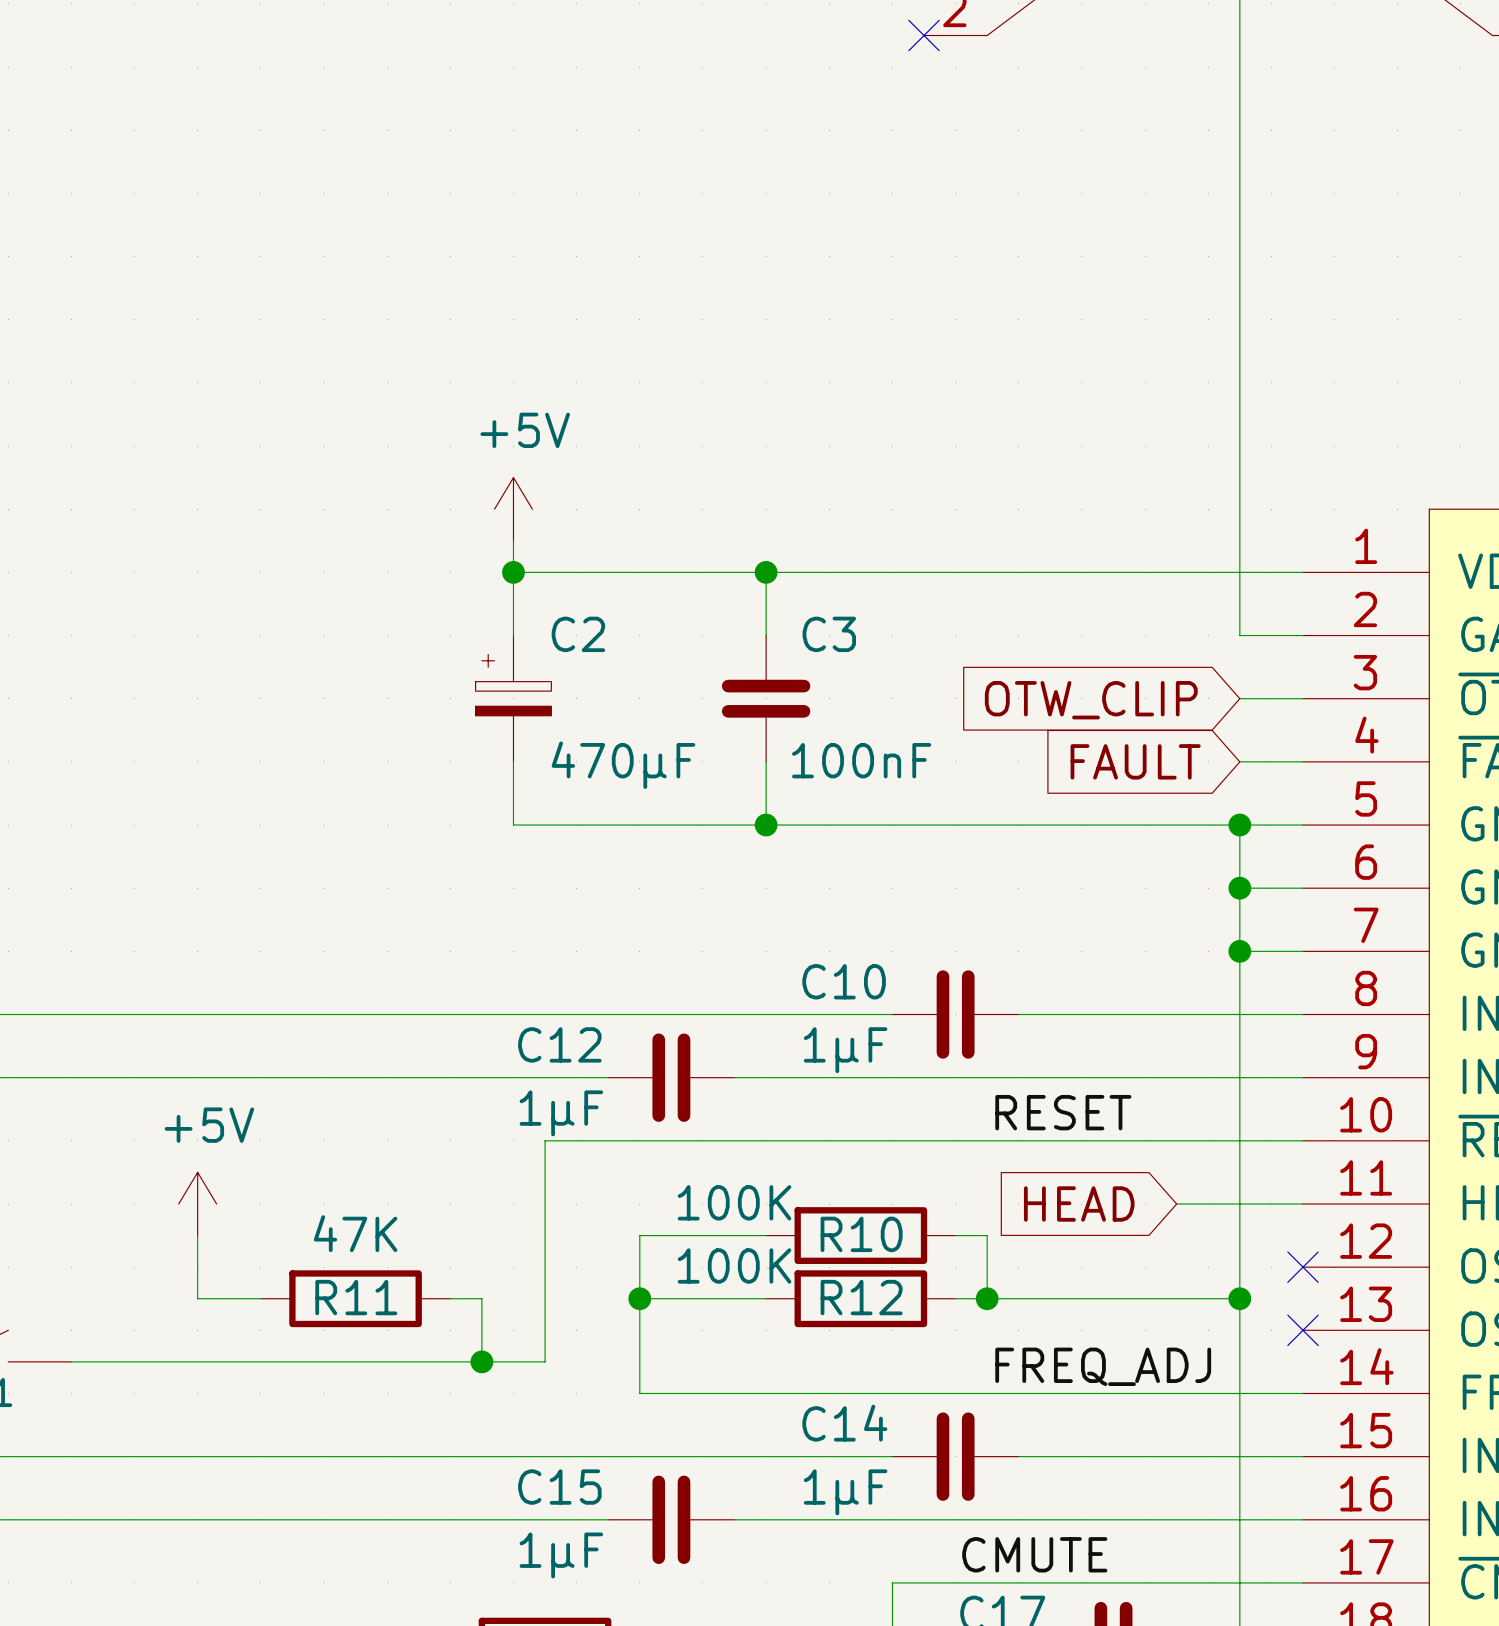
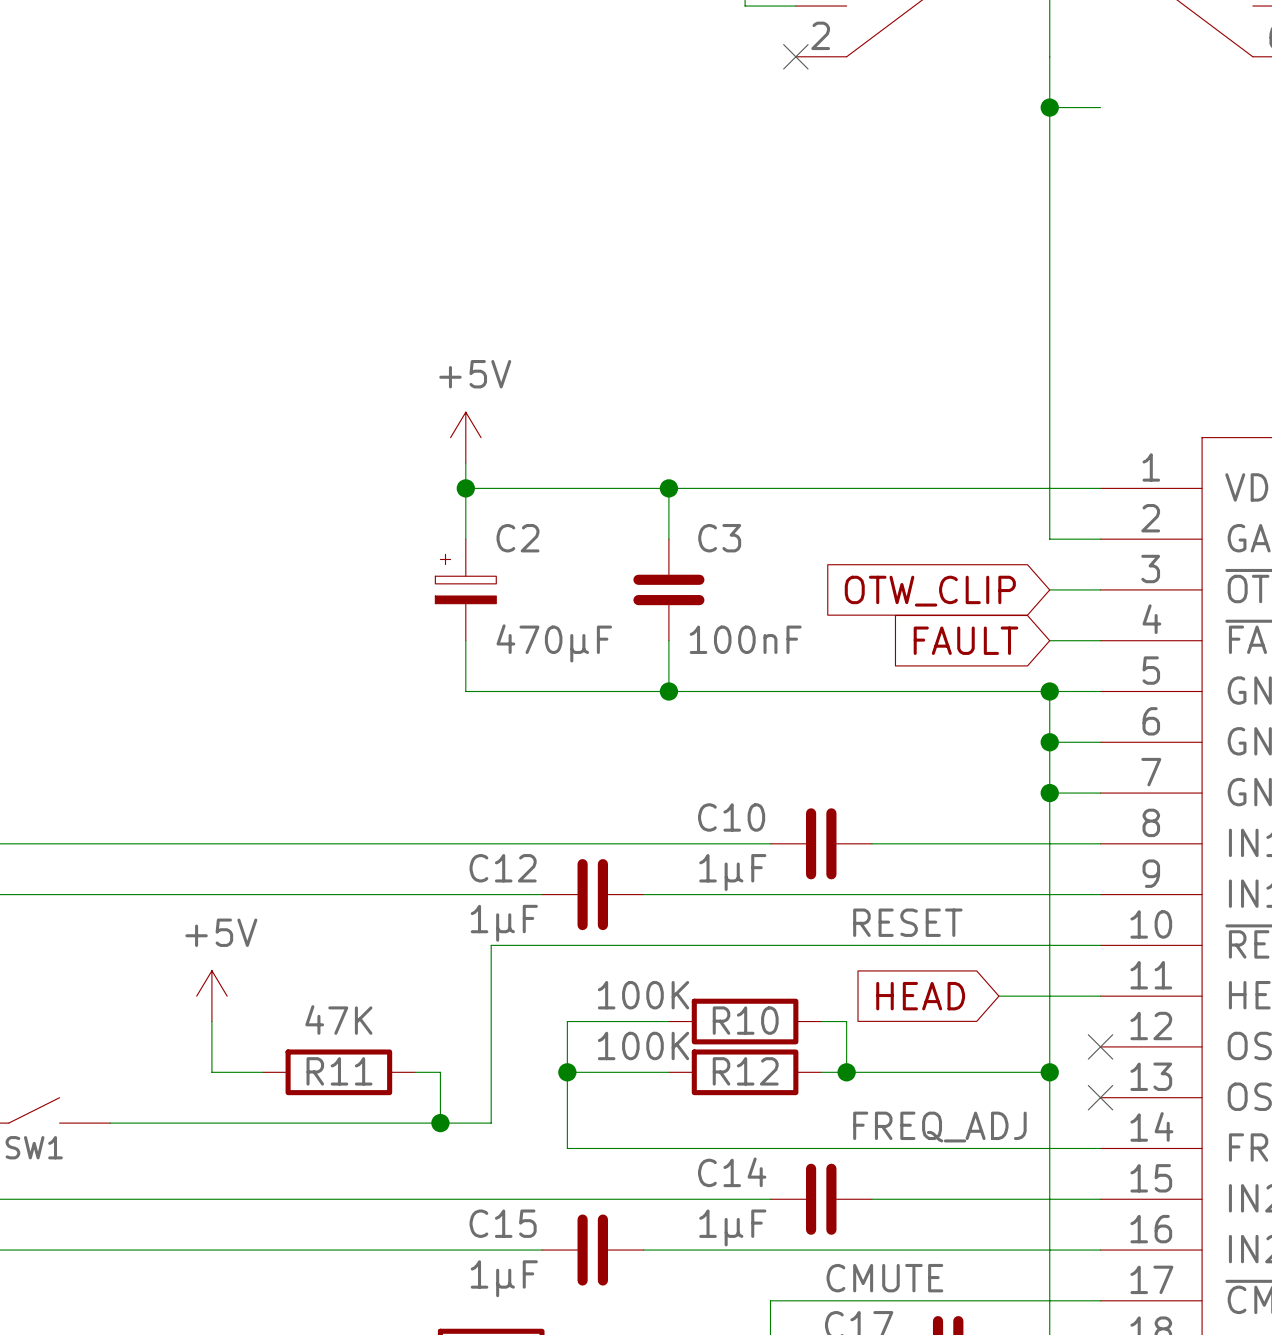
wire: none -> (1049, 107) (1100, 107)
junction: none -> (1049, 107)

